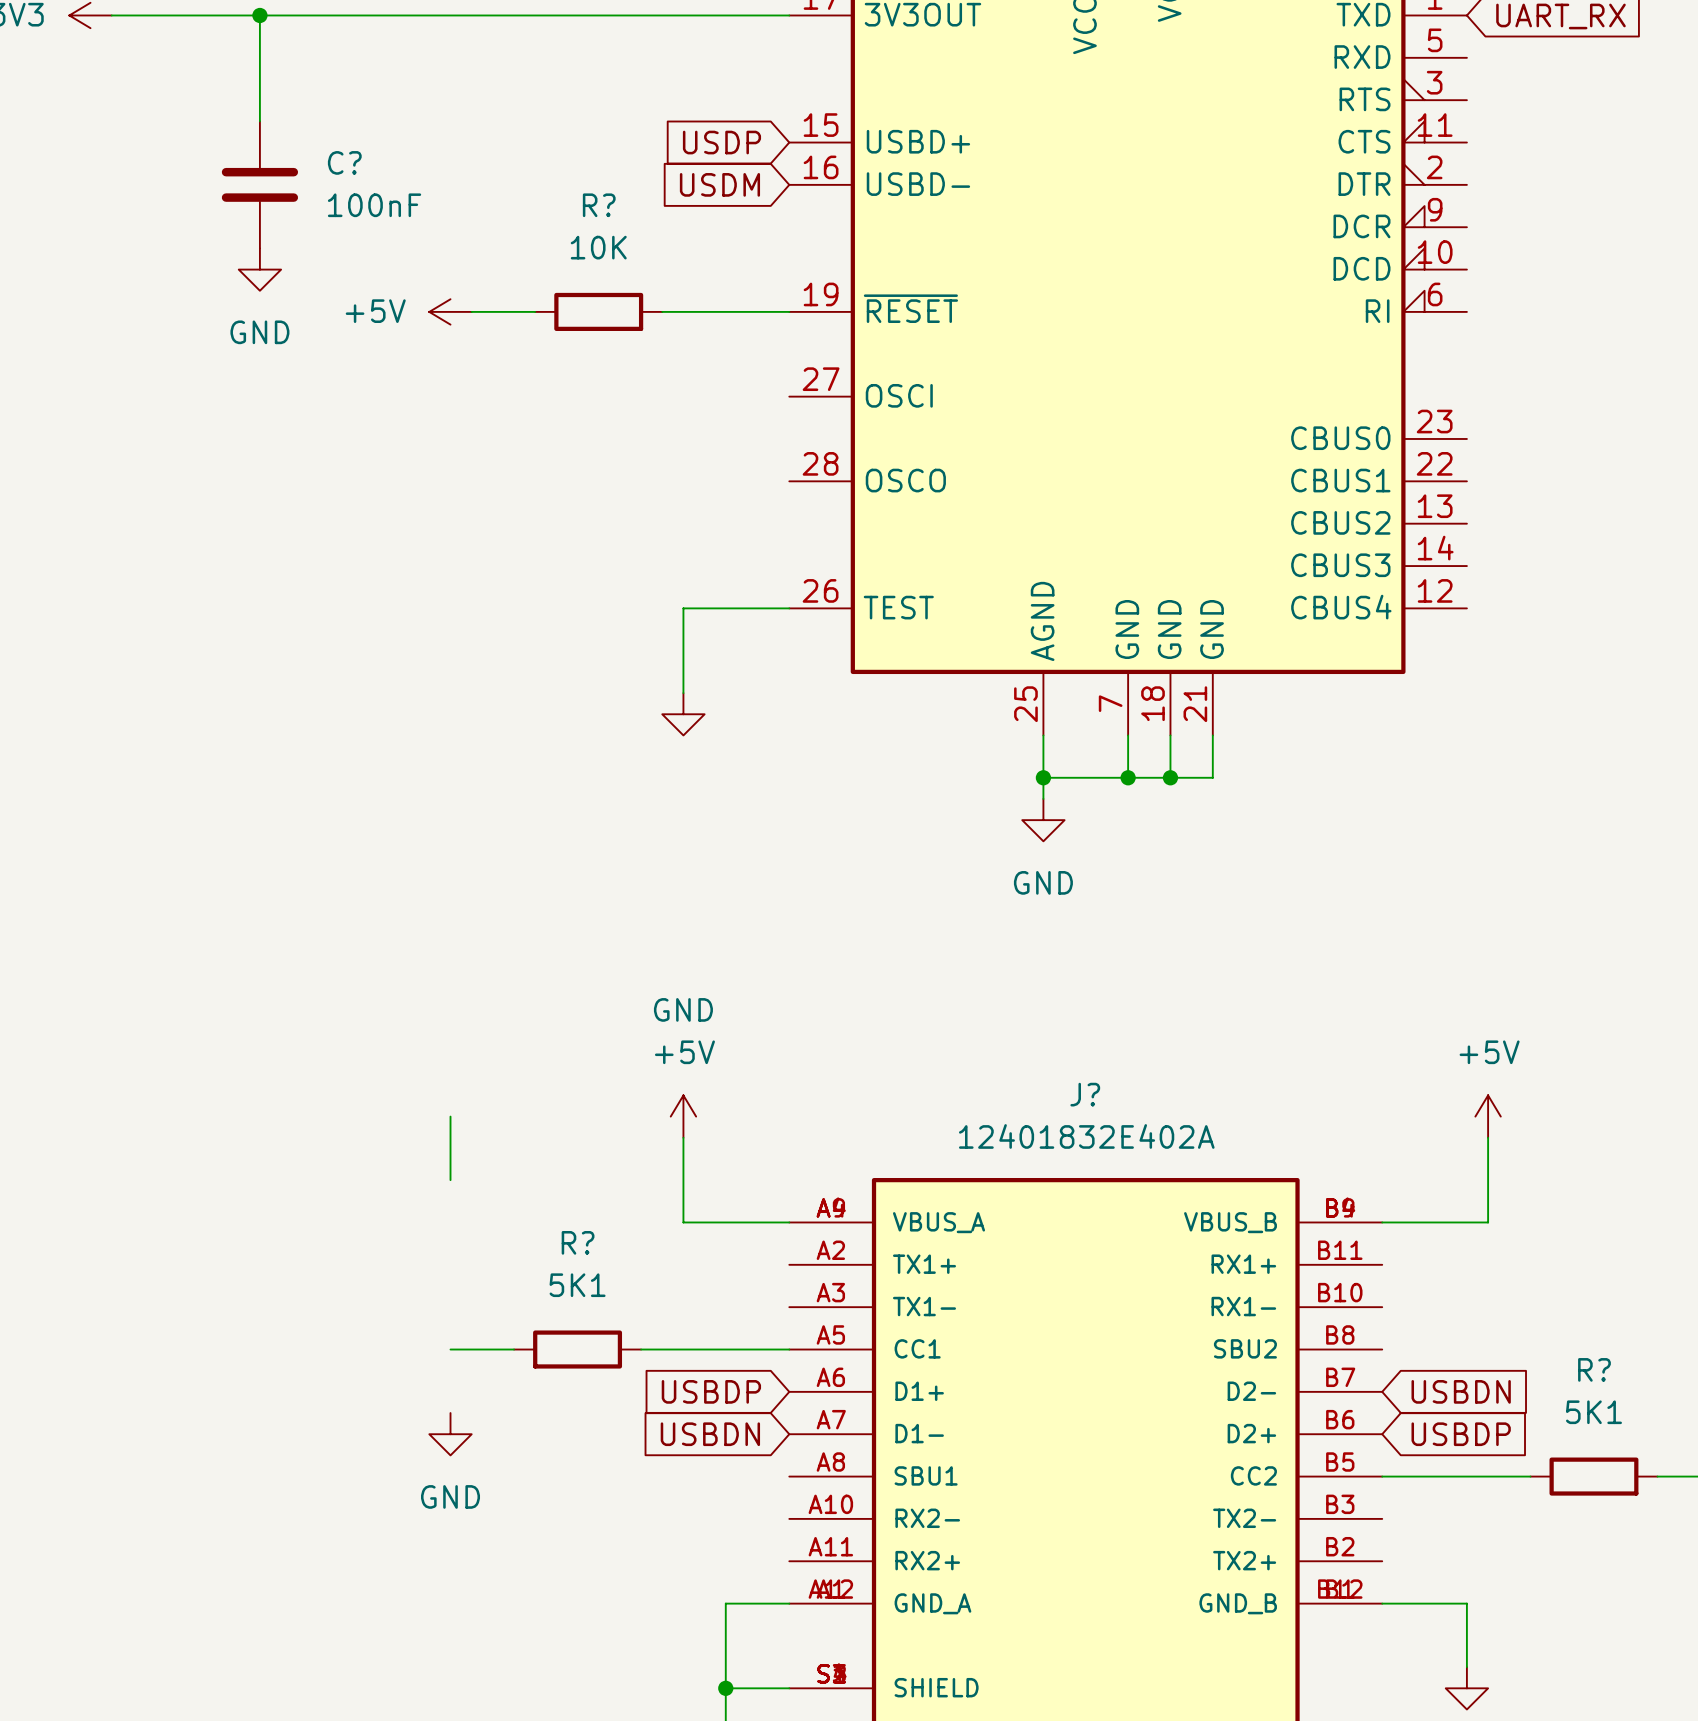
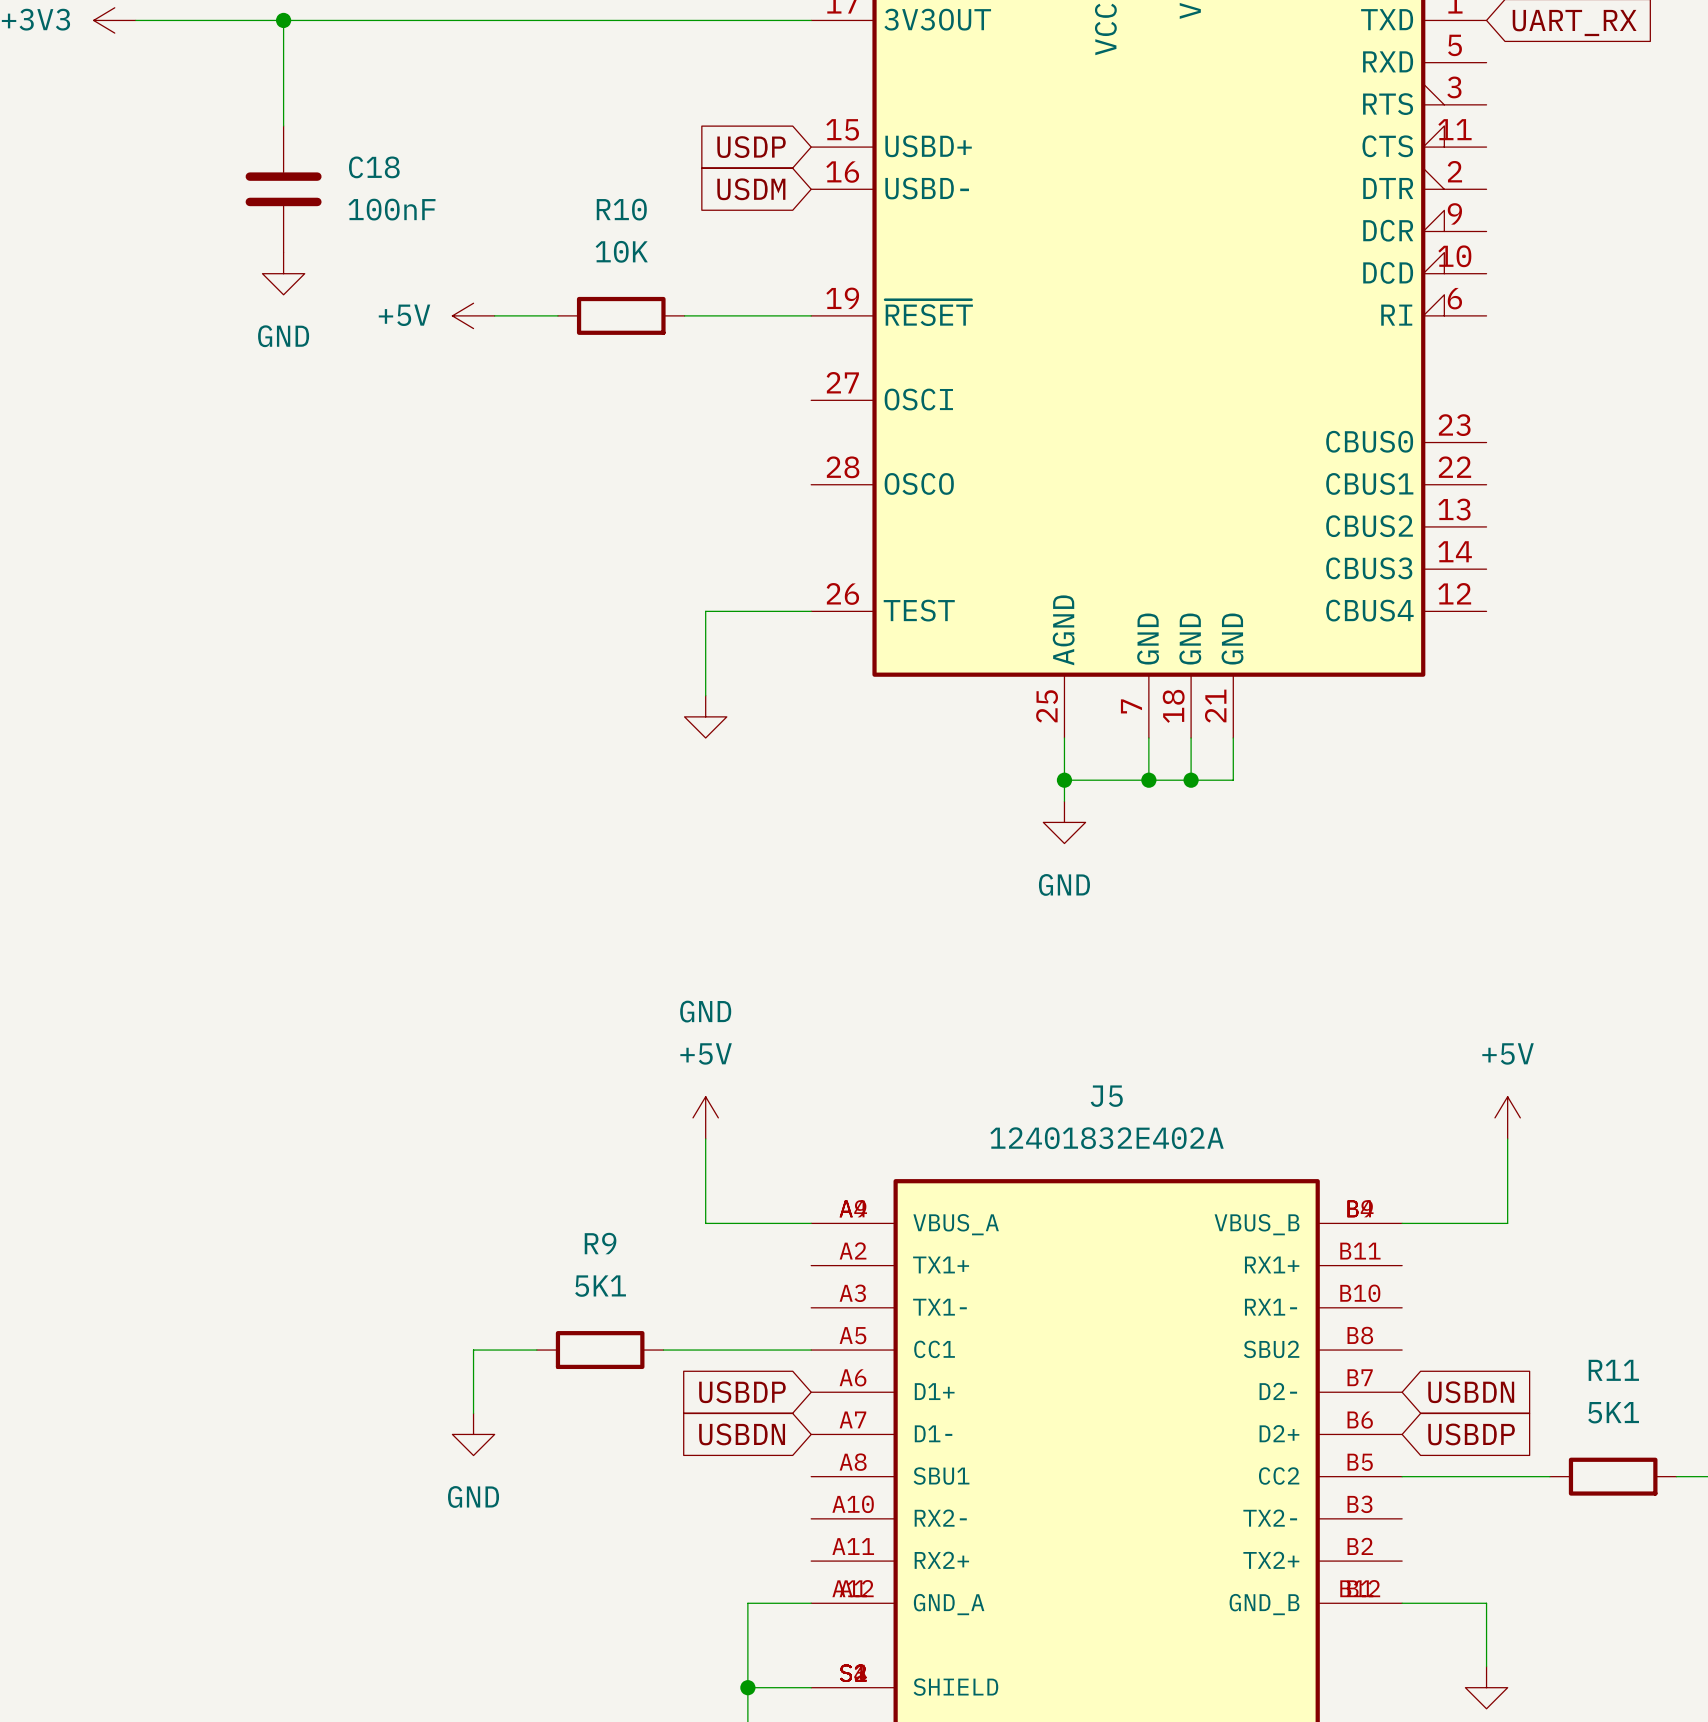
C? name: C? (344, 162) -> C18 (374, 167)
R? name: R? (599, 205) -> R10 (621, 209)
J? name: J? (1085, 1094) -> J5 (1106, 1096)
wire: (450, 1116) (450, 1180) -> (473, 1350) (473, 1413)
R? name: R? (578, 1242) -> R9 (600, 1243)
R? name: R? (1594, 1369) -> R11 (1613, 1370)

